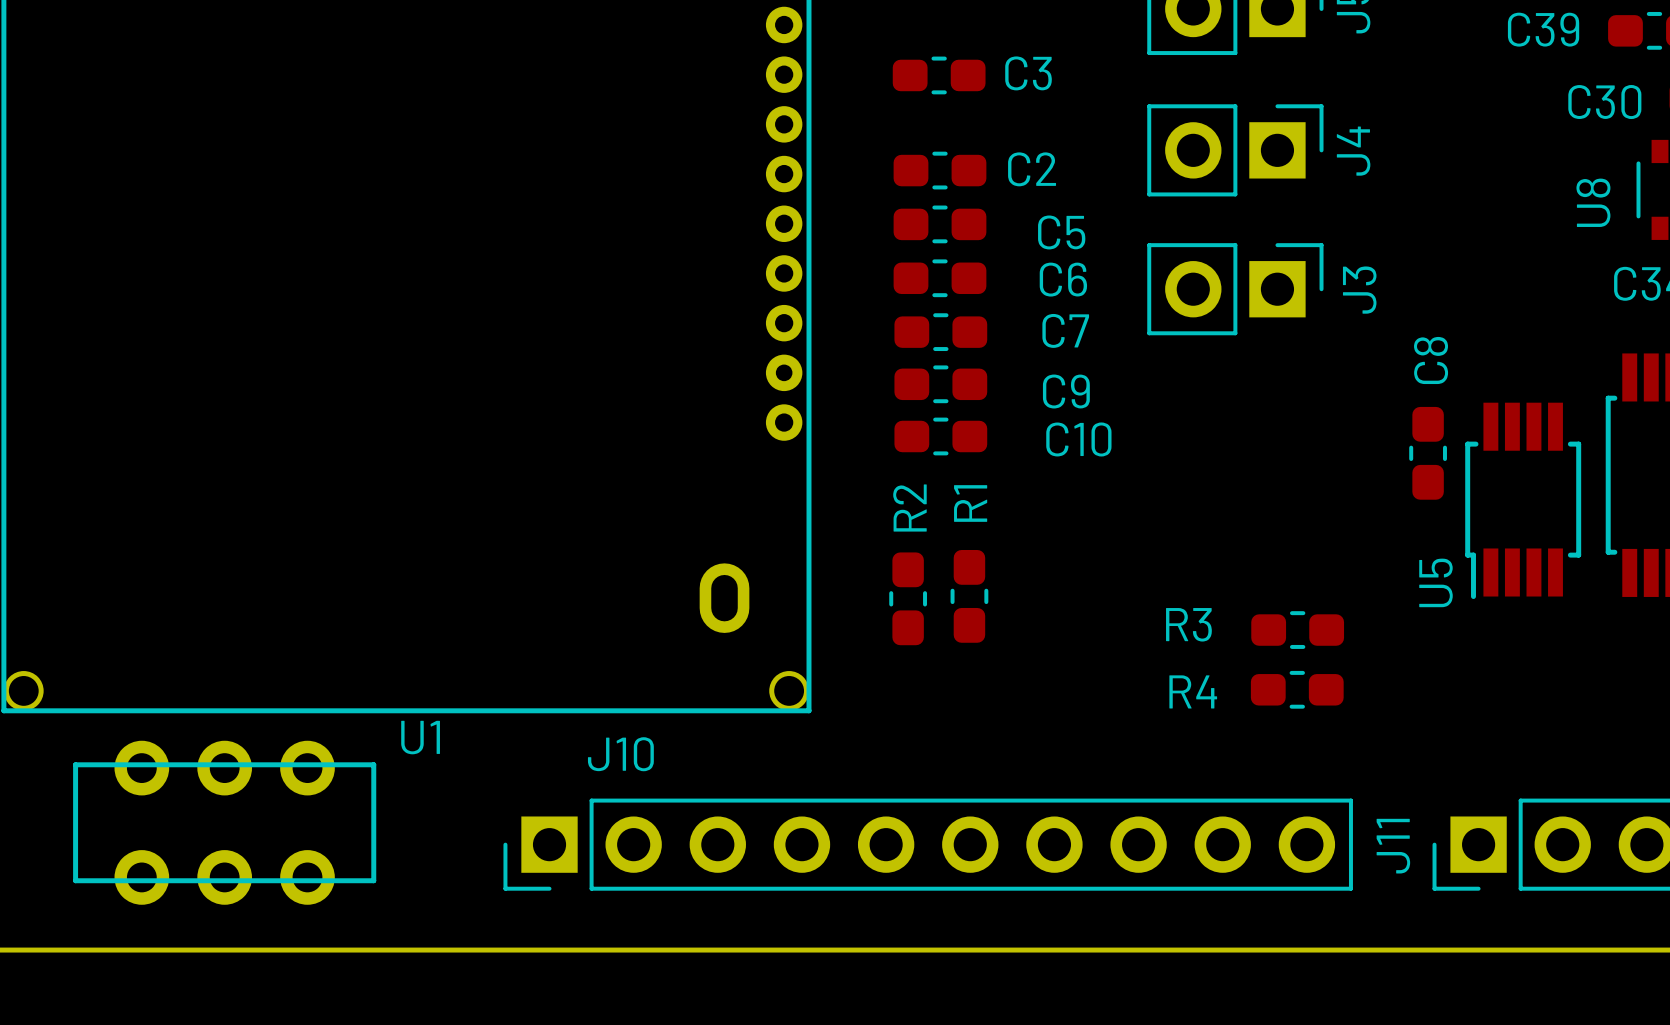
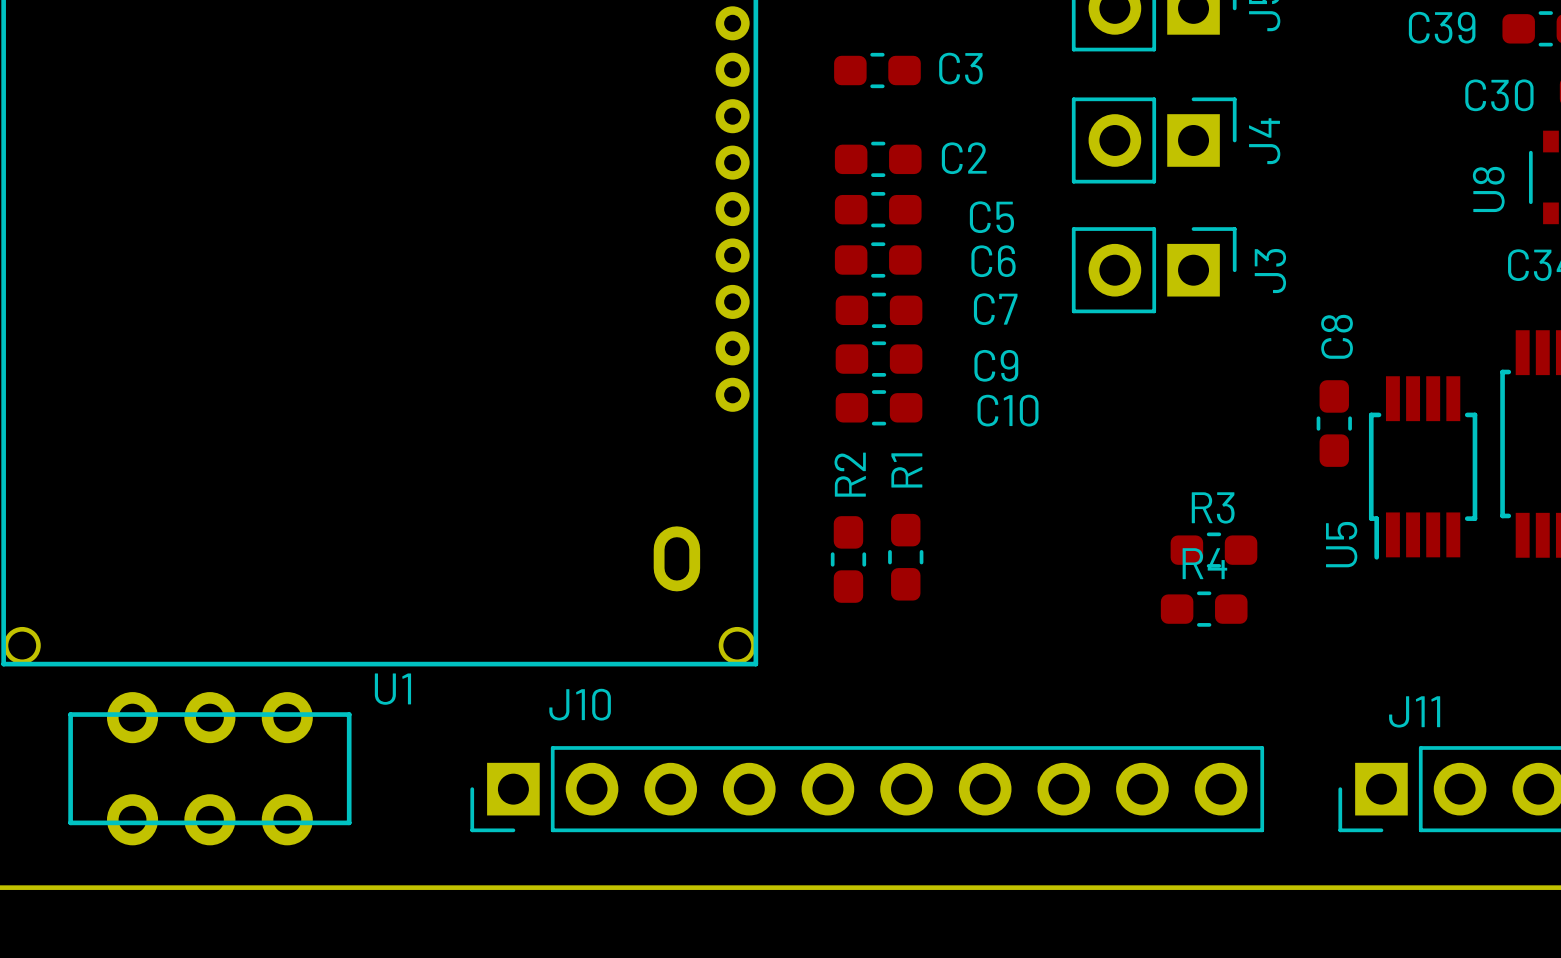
R3 name position: R3 (1188, 624) -> R3 (1213, 507)
R3 position: (1297, 630) -> (1213, 550)
R4 position: (1297, 689) -> (1204, 609)
R4 name position: R4 (1193, 691) -> R4 (1204, 563)
J11 name rotation: 0° (1393, 846) -> 90° clockwise (1414, 711)
J11 name position: J11 (1393, 846) -> J11 (1414, 711)

